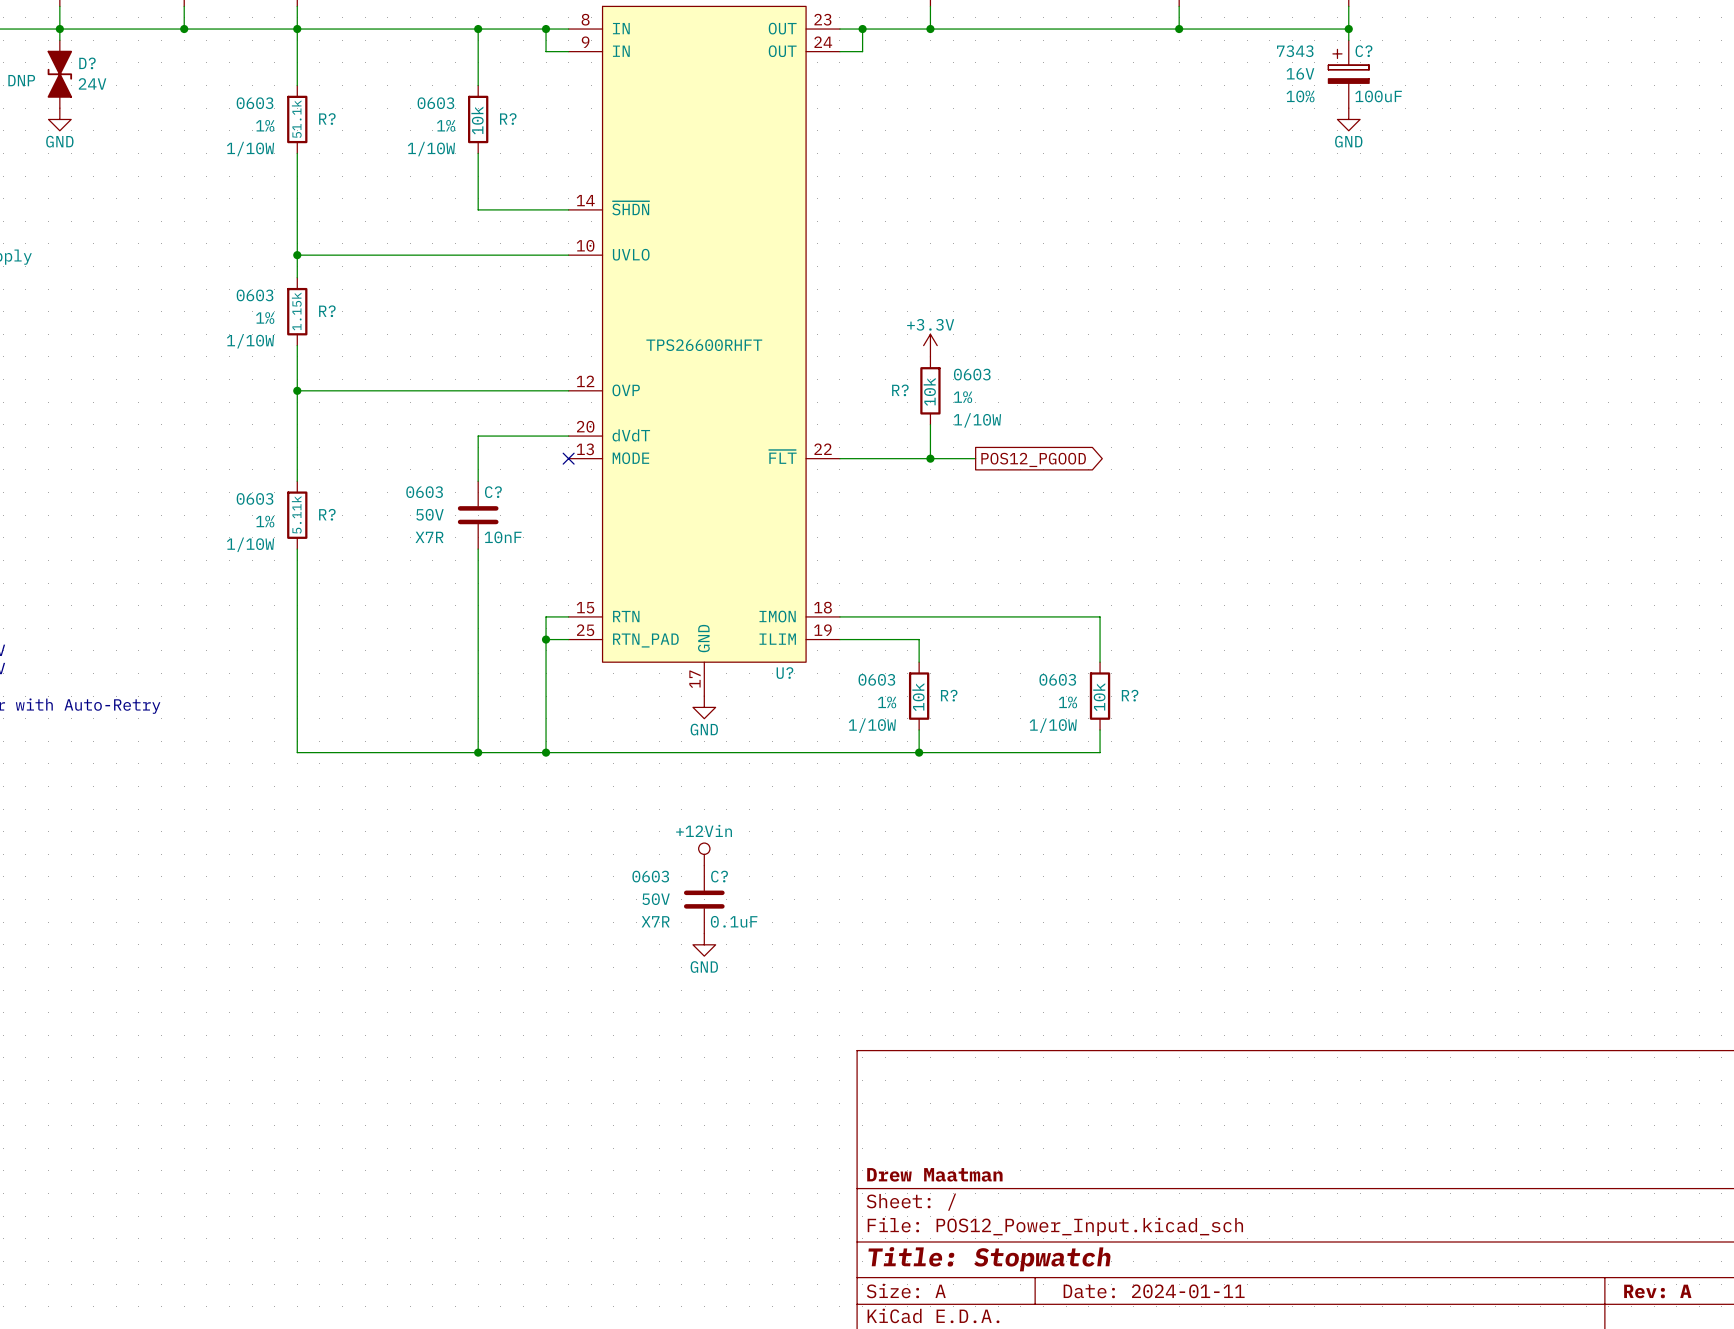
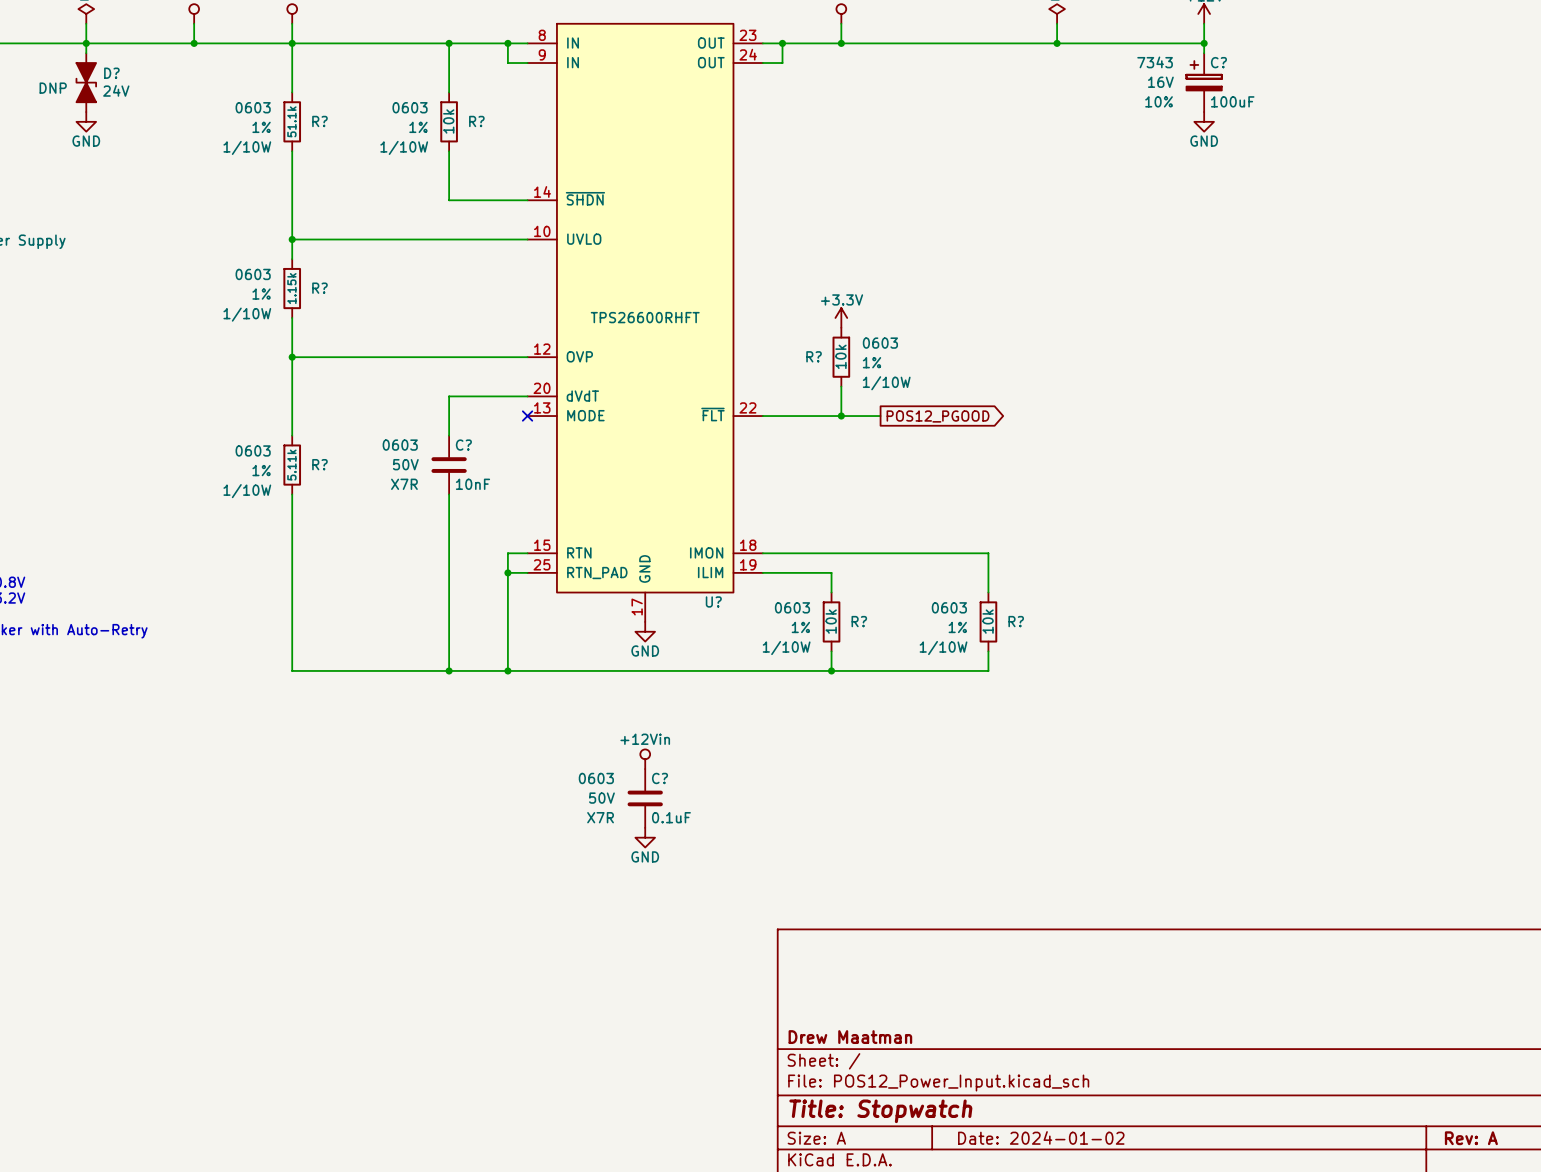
title block: Date: 2024-01-11 (1154, 1291) -> Date: 2024-01-02 (1041, 1137)

